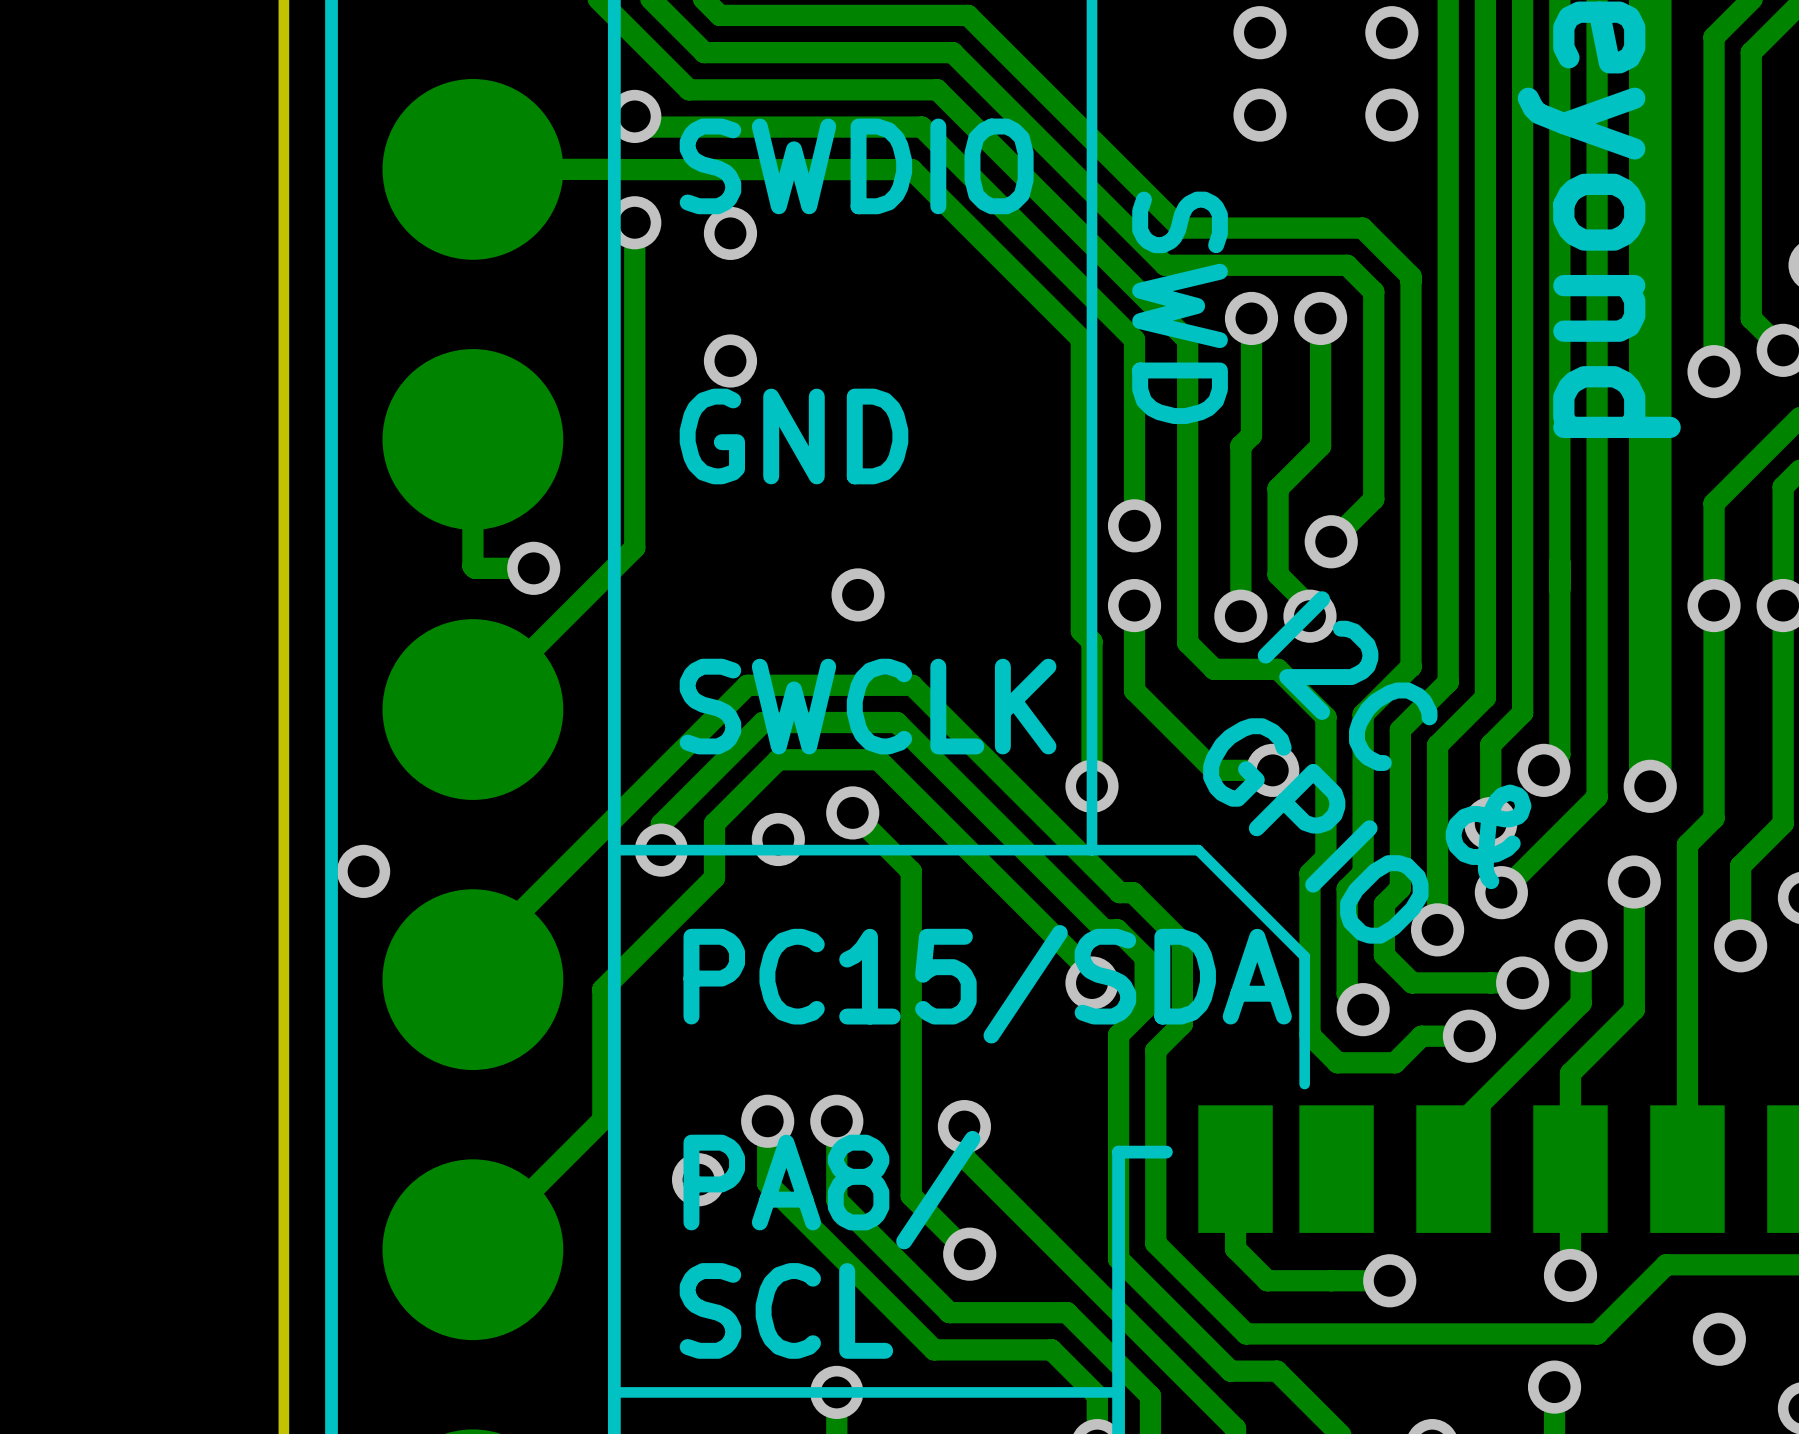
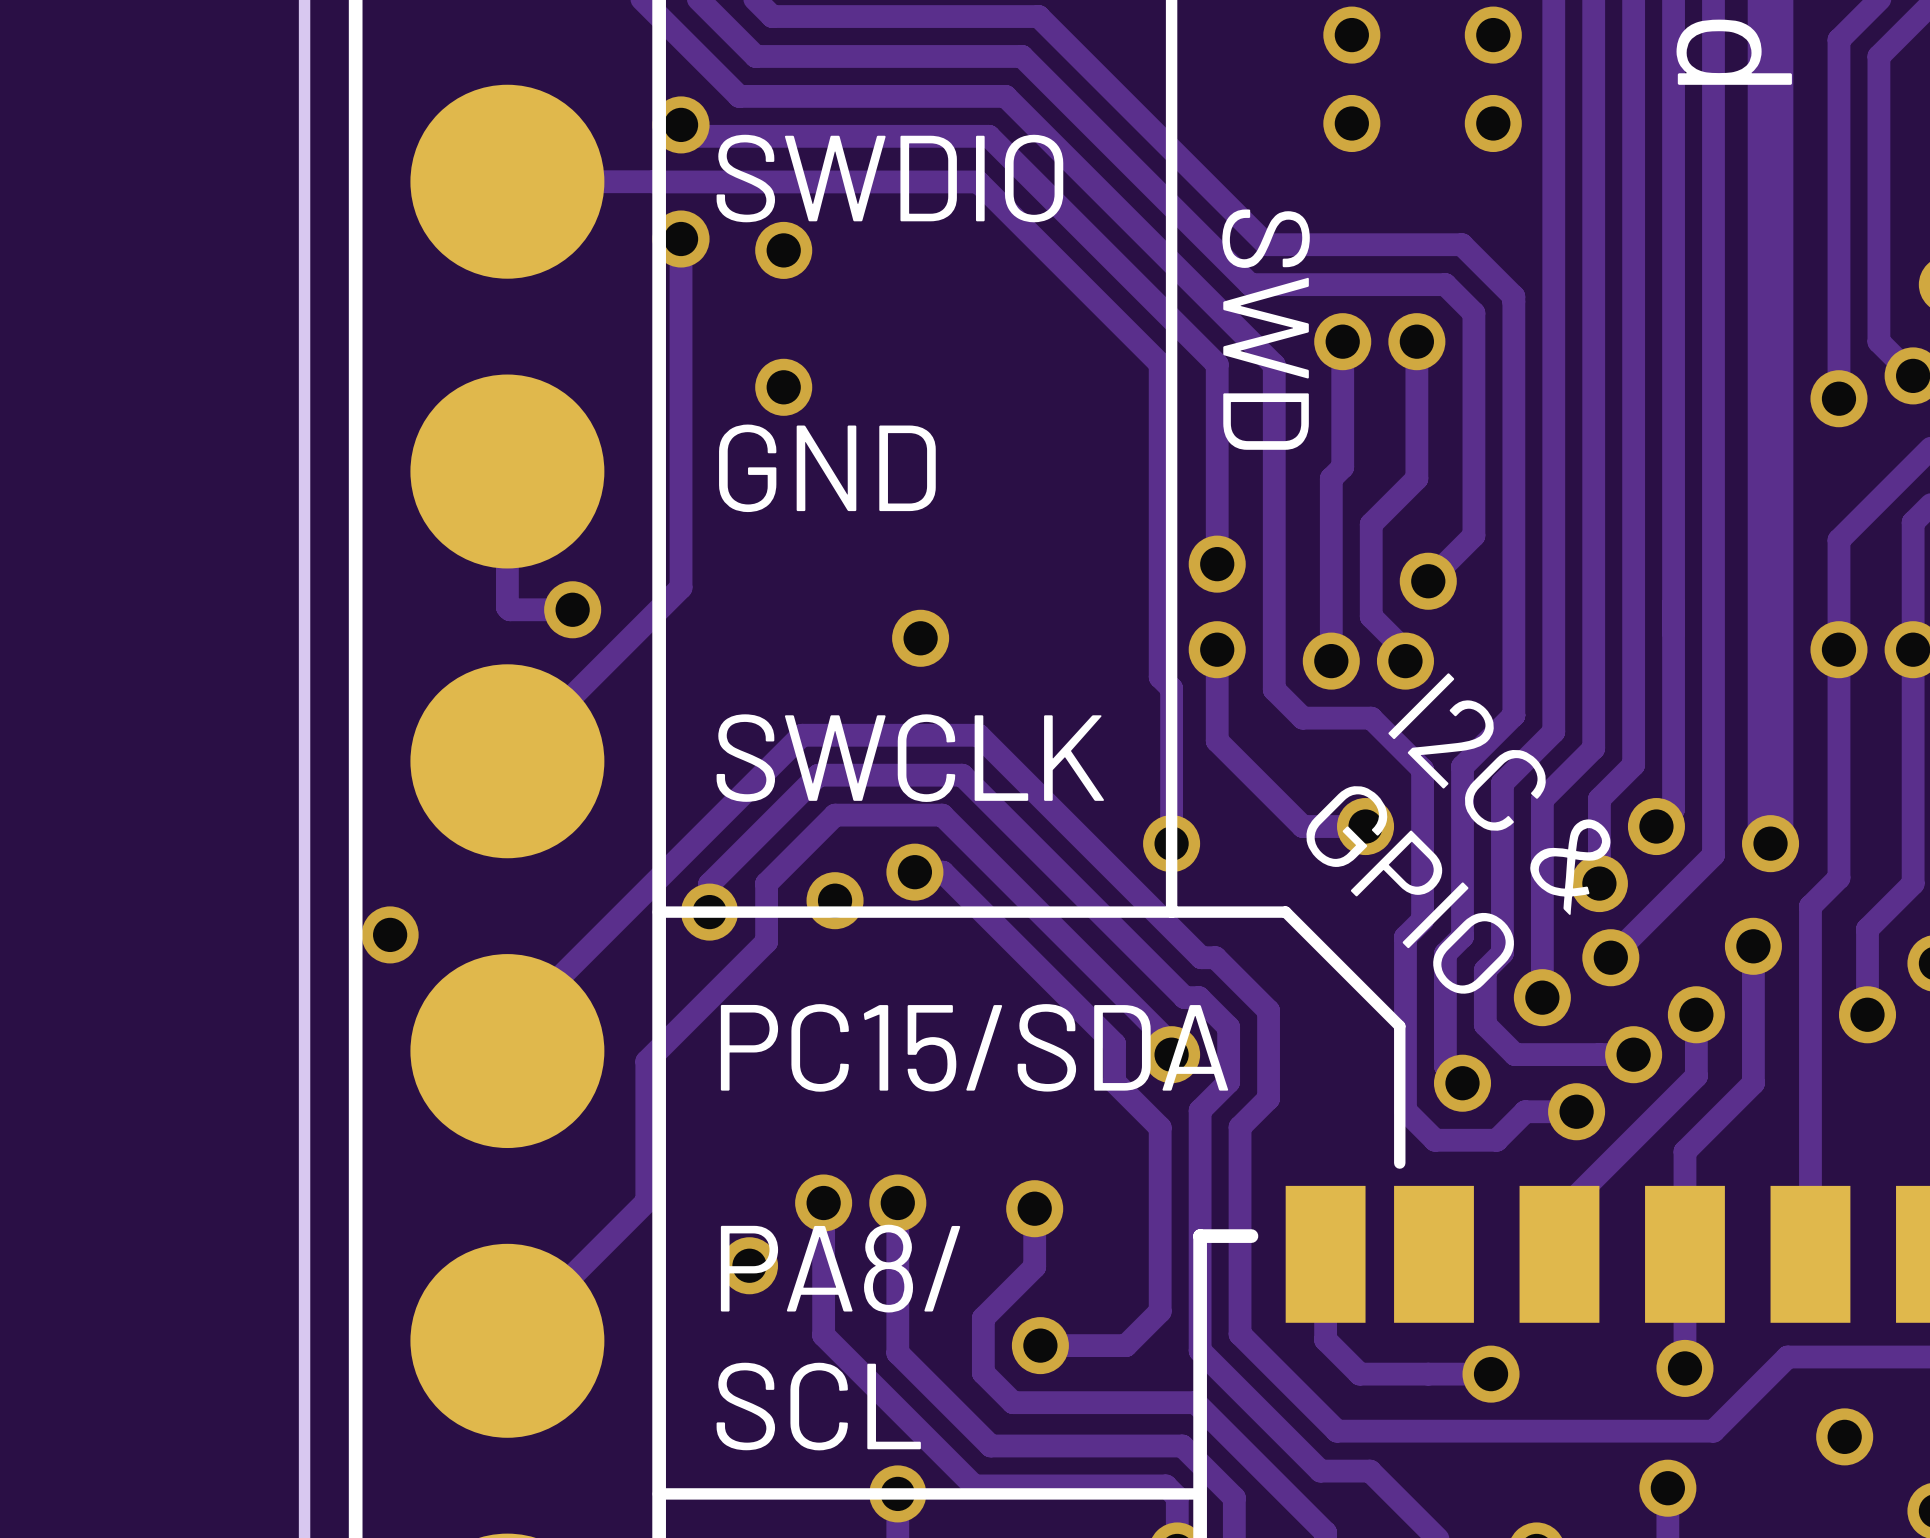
track: (852, 812) (911, 871) (911, 1195) (969, 1254) -> (914, 872) (942, 872) (1114, 1043) (1114, 1082) (1160, 1127) (1160, 1311) (1125, 1345) (1040, 1345)
track: (964, 1157) (1114, 1307) -> none
track: (767, 1183) (934, 1349) (1051, 1349) (1086, 1384) -> (823, 1269) (823, 1335) (974, 1485) (1165, 1485)
track: (836, 1199) (916, 1279) -> (1034, 1241) (1034, 1266) (983, 1318) (983, 1372)
track: none -> (897, 1287) (897, 1353) (990, 1445) (1182, 1445)
track: (944, 1307) (949, 1312) (1067, 1312) (1102, 1347) -> (1013, 1402) (1195, 1402)

